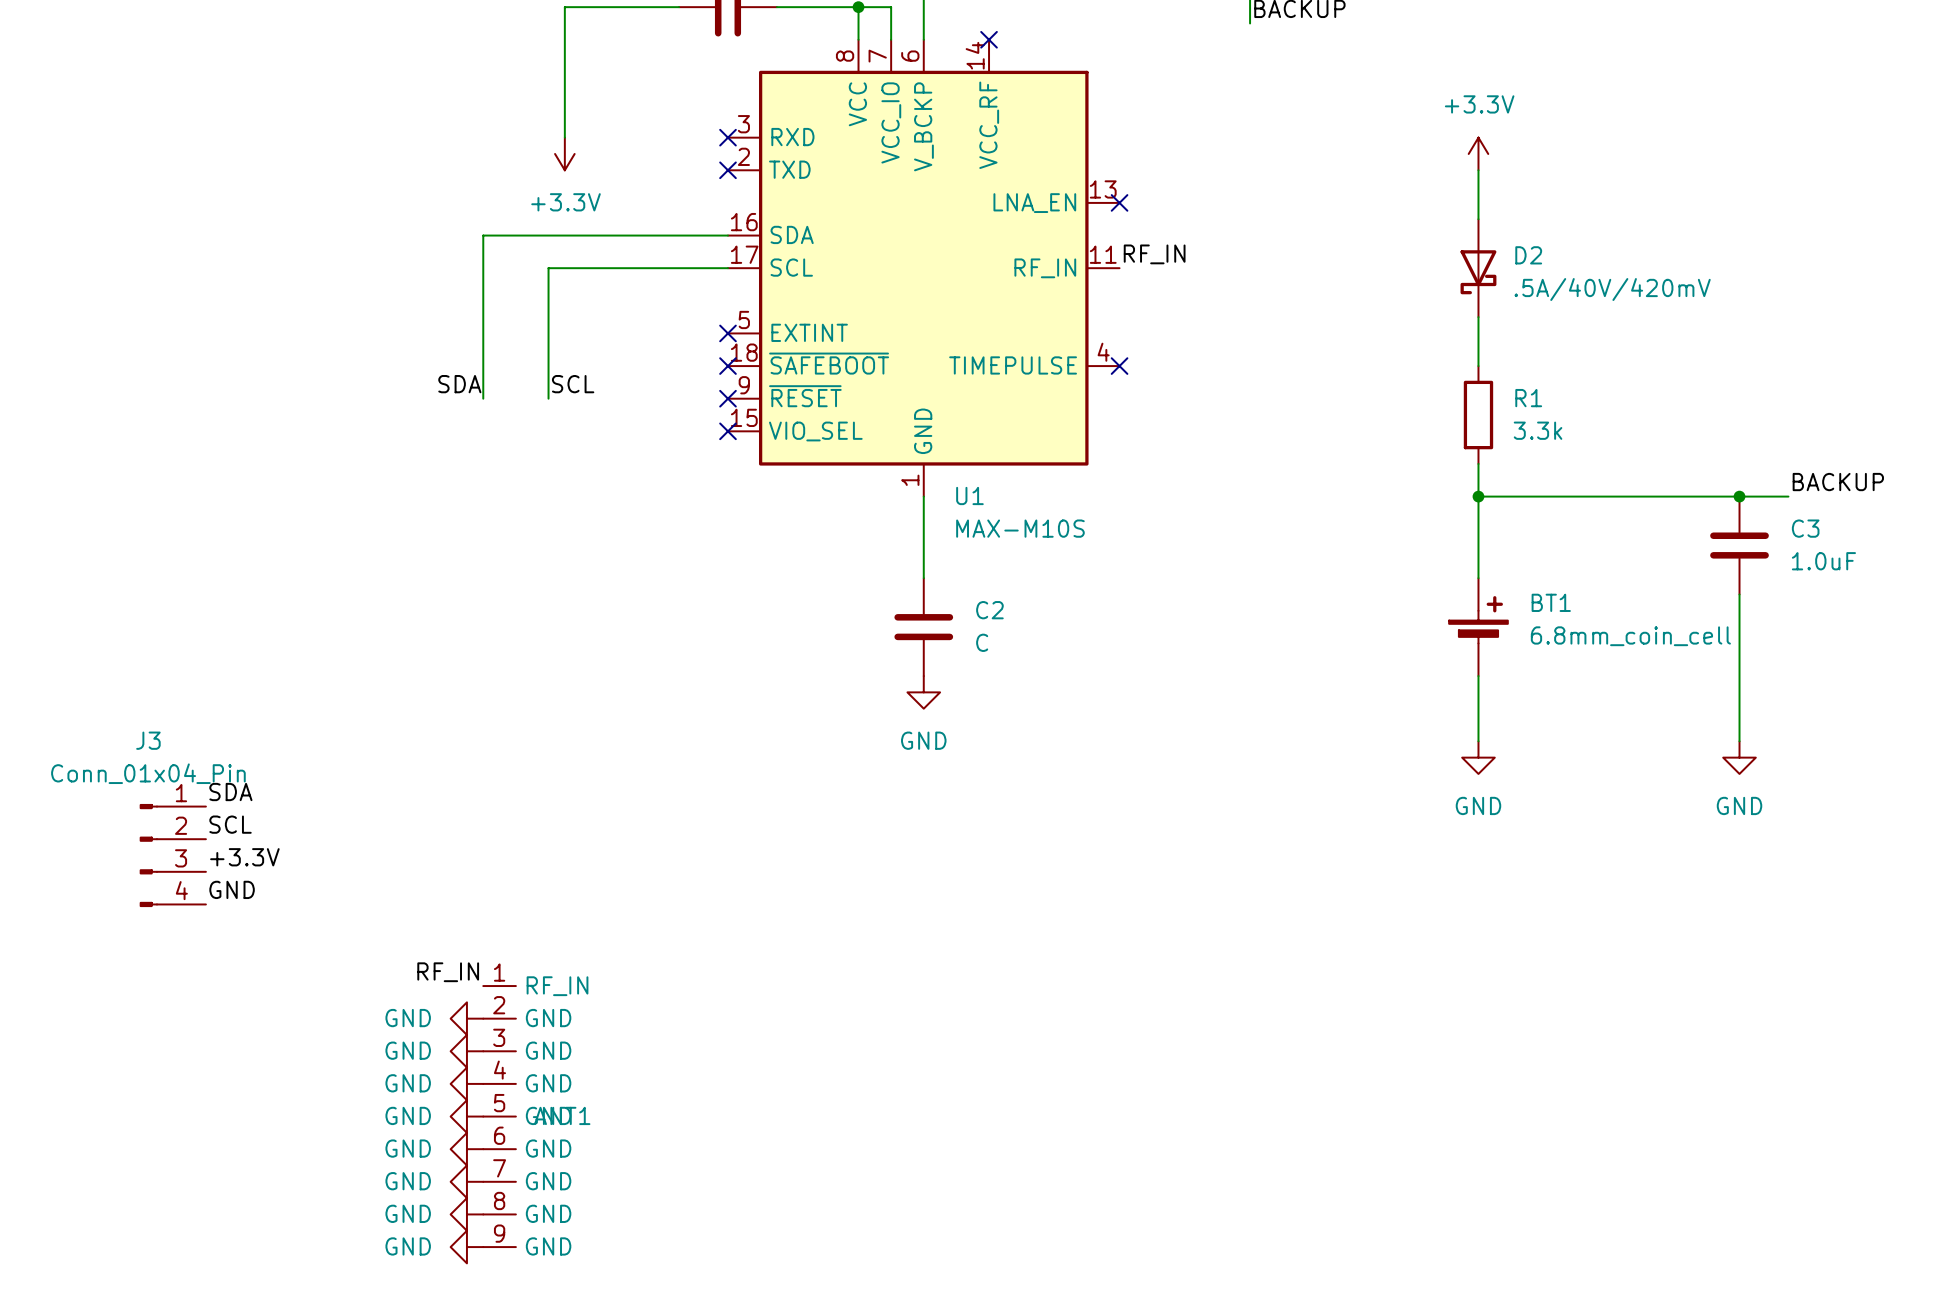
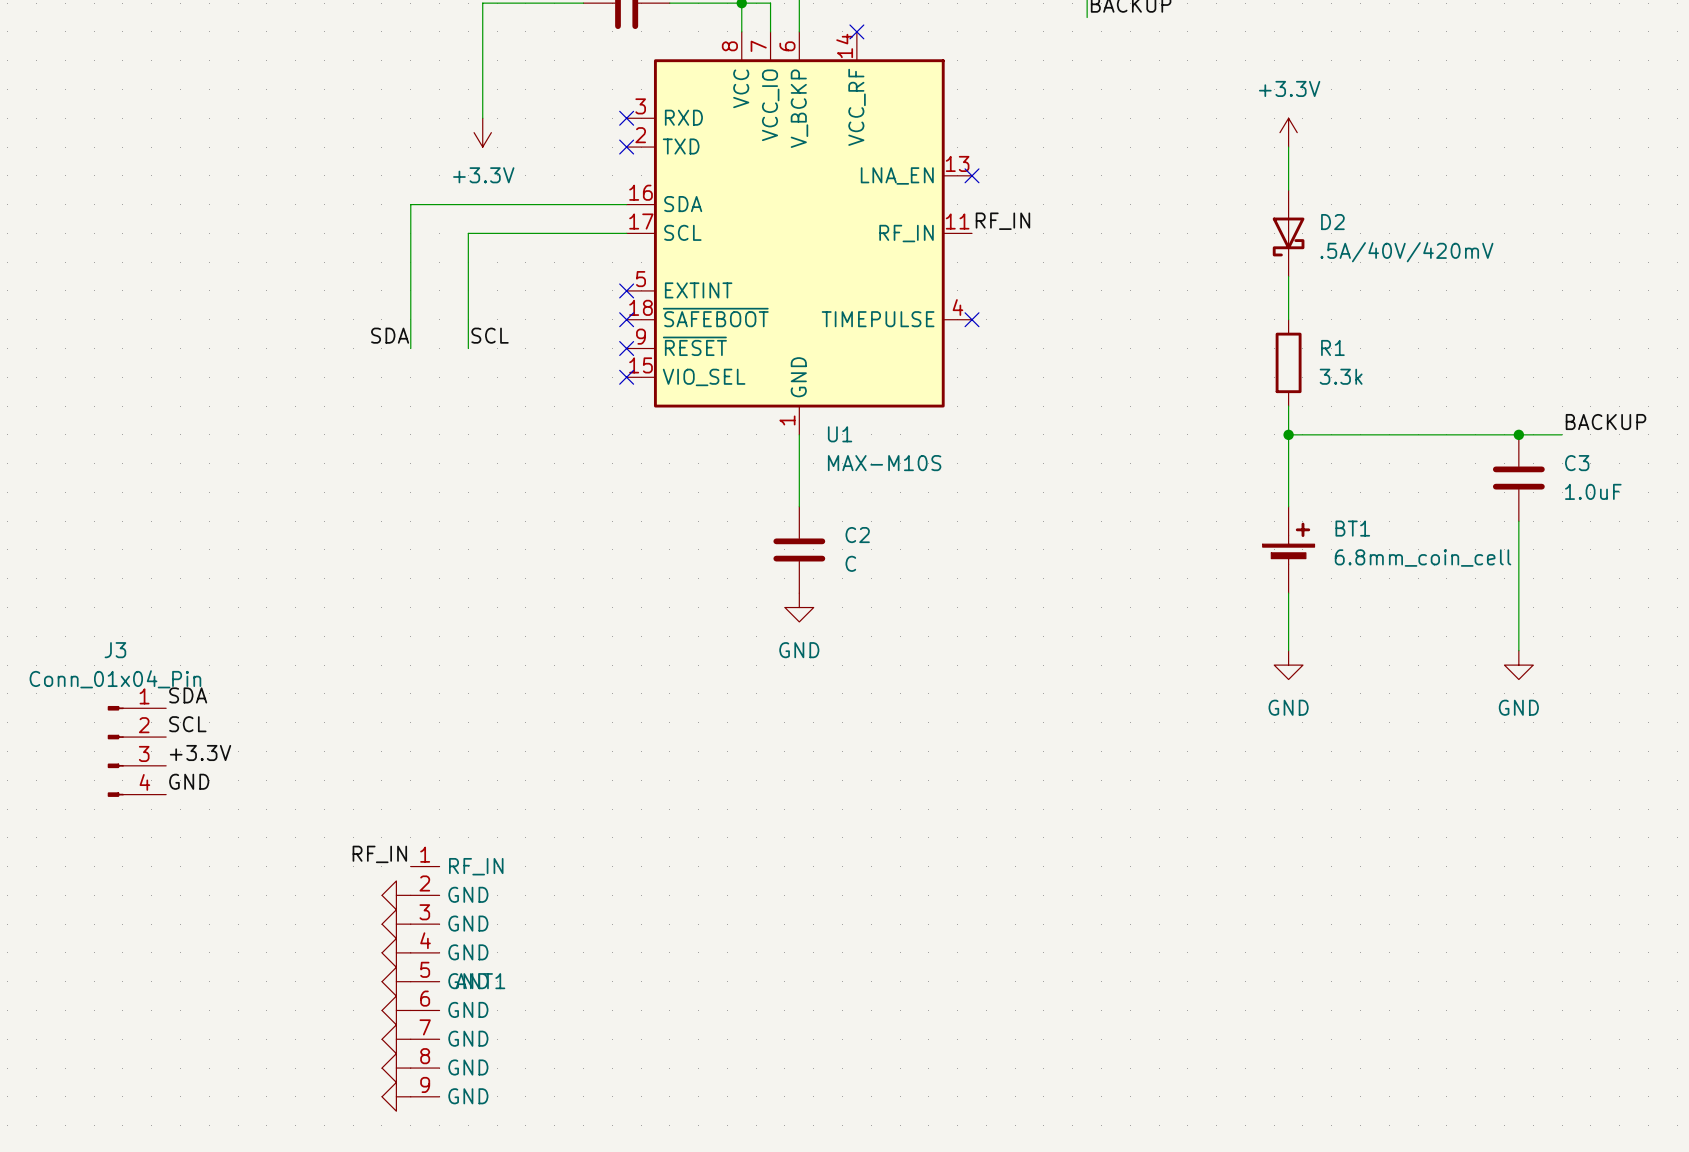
power symbol text: GND (408, 1018) -> none
power symbol text: GND (408, 1050) -> none
power symbol text: GND (408, 1083) -> none
power symbol text: GND (408, 1115) -> none
power symbol text: GND (408, 1148) -> none
power symbol text: GND (408, 1181) -> none
power symbol text: GND (408, 1213) -> none
power symbol text: GND (408, 1246) -> none

